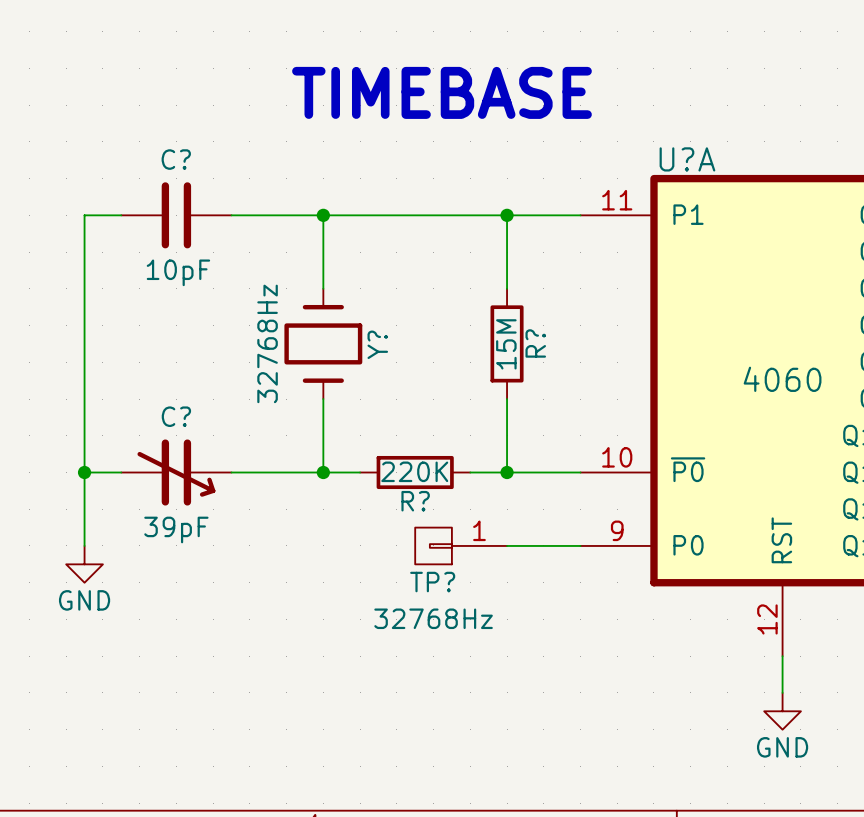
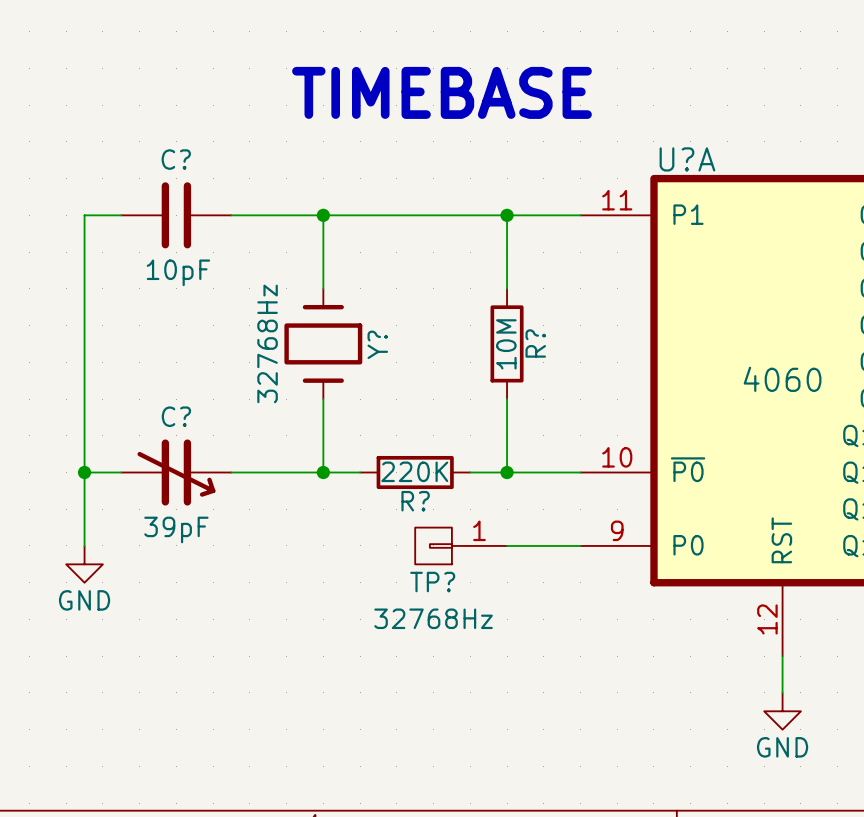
R? value: 15M (506, 344) -> 10M (506, 344)

